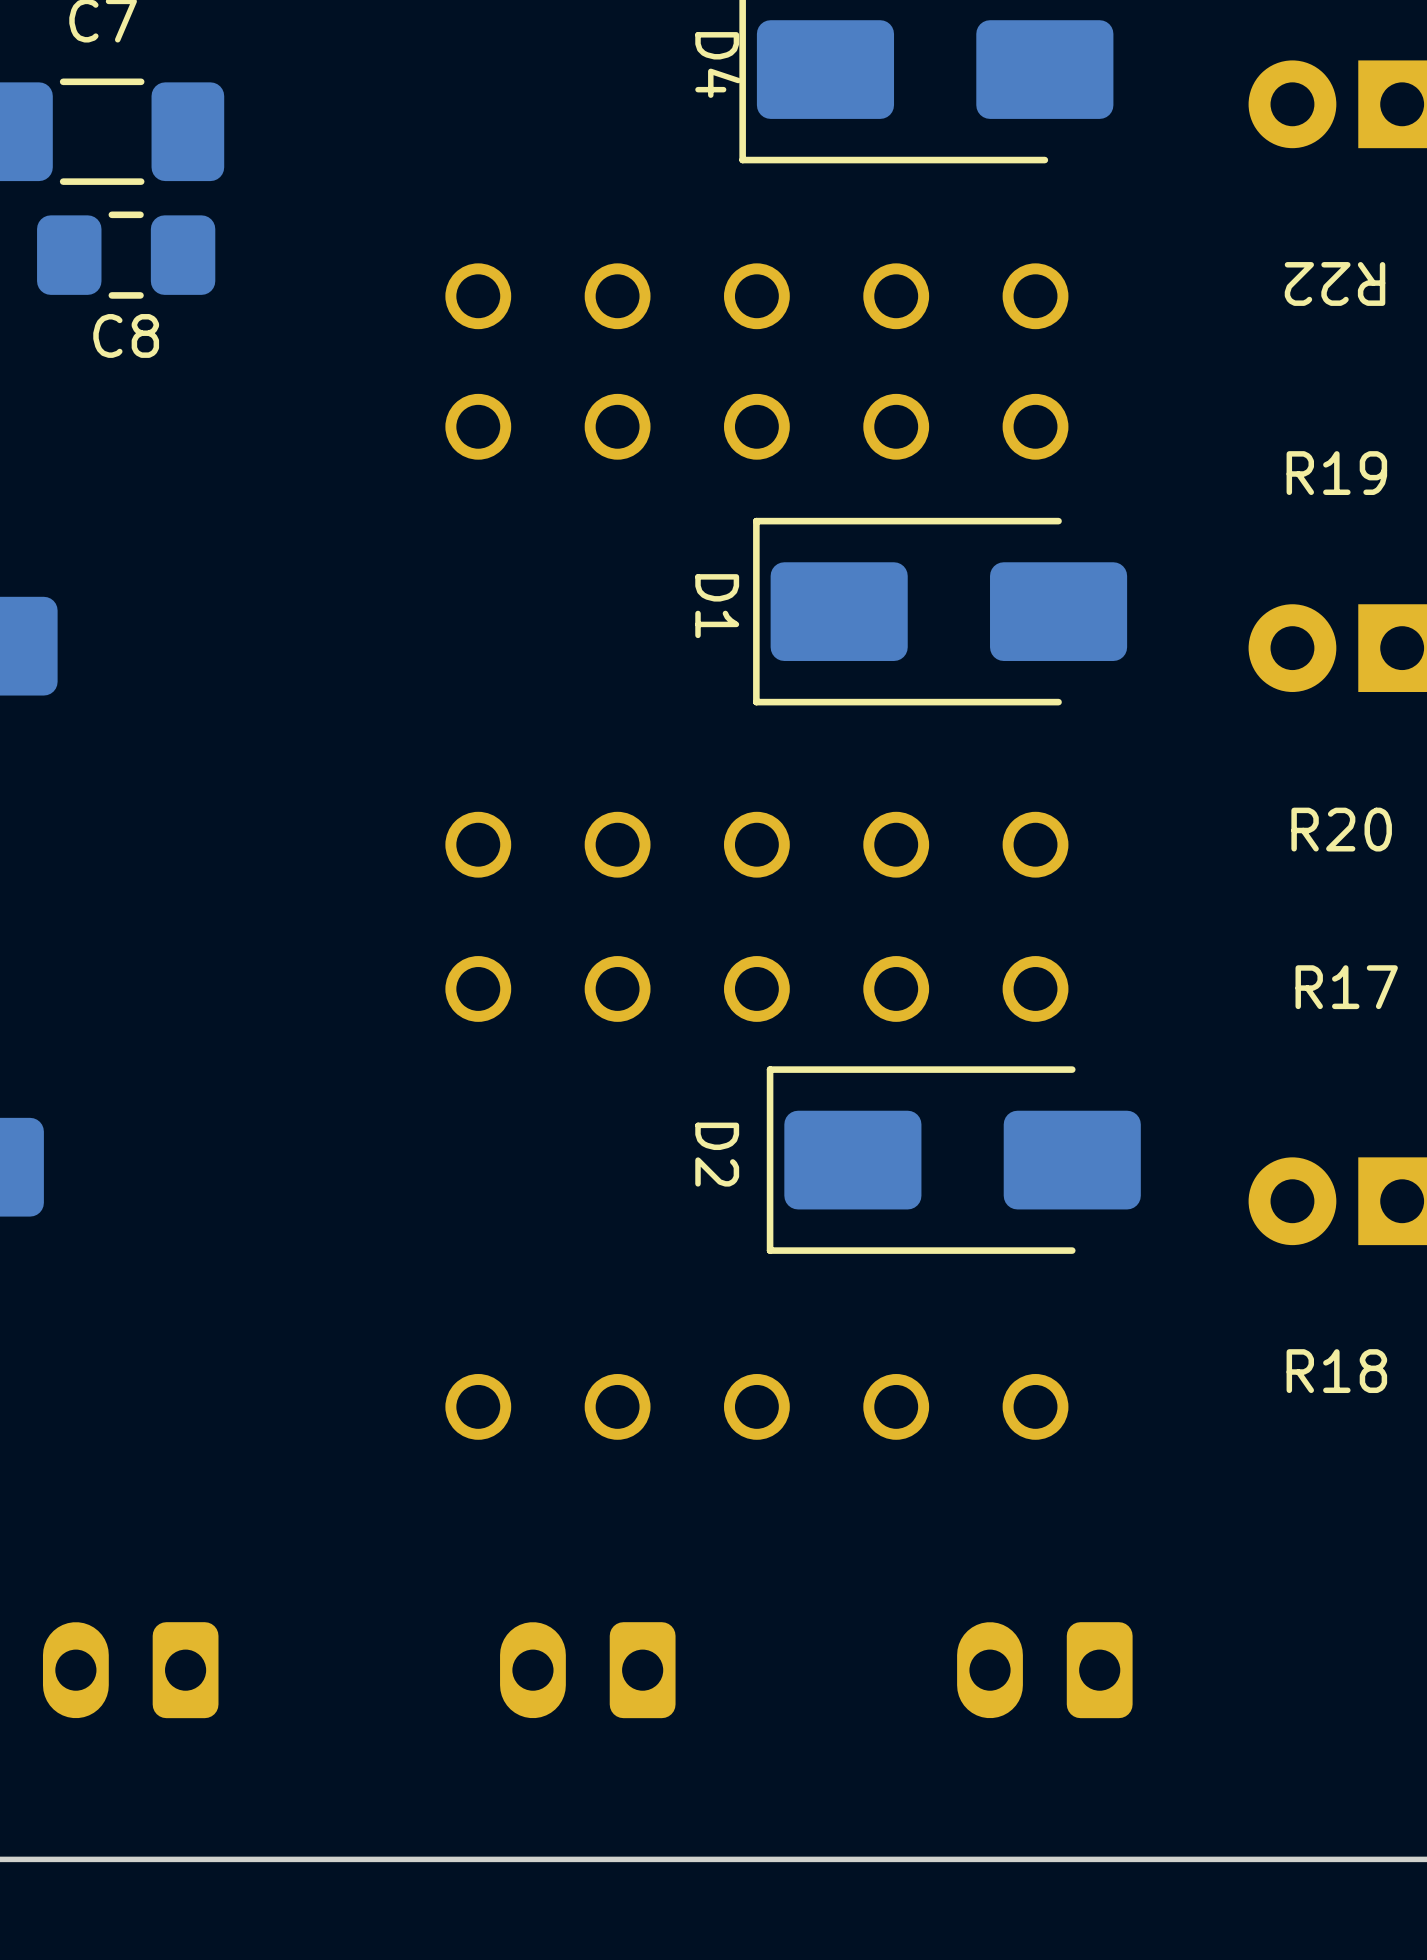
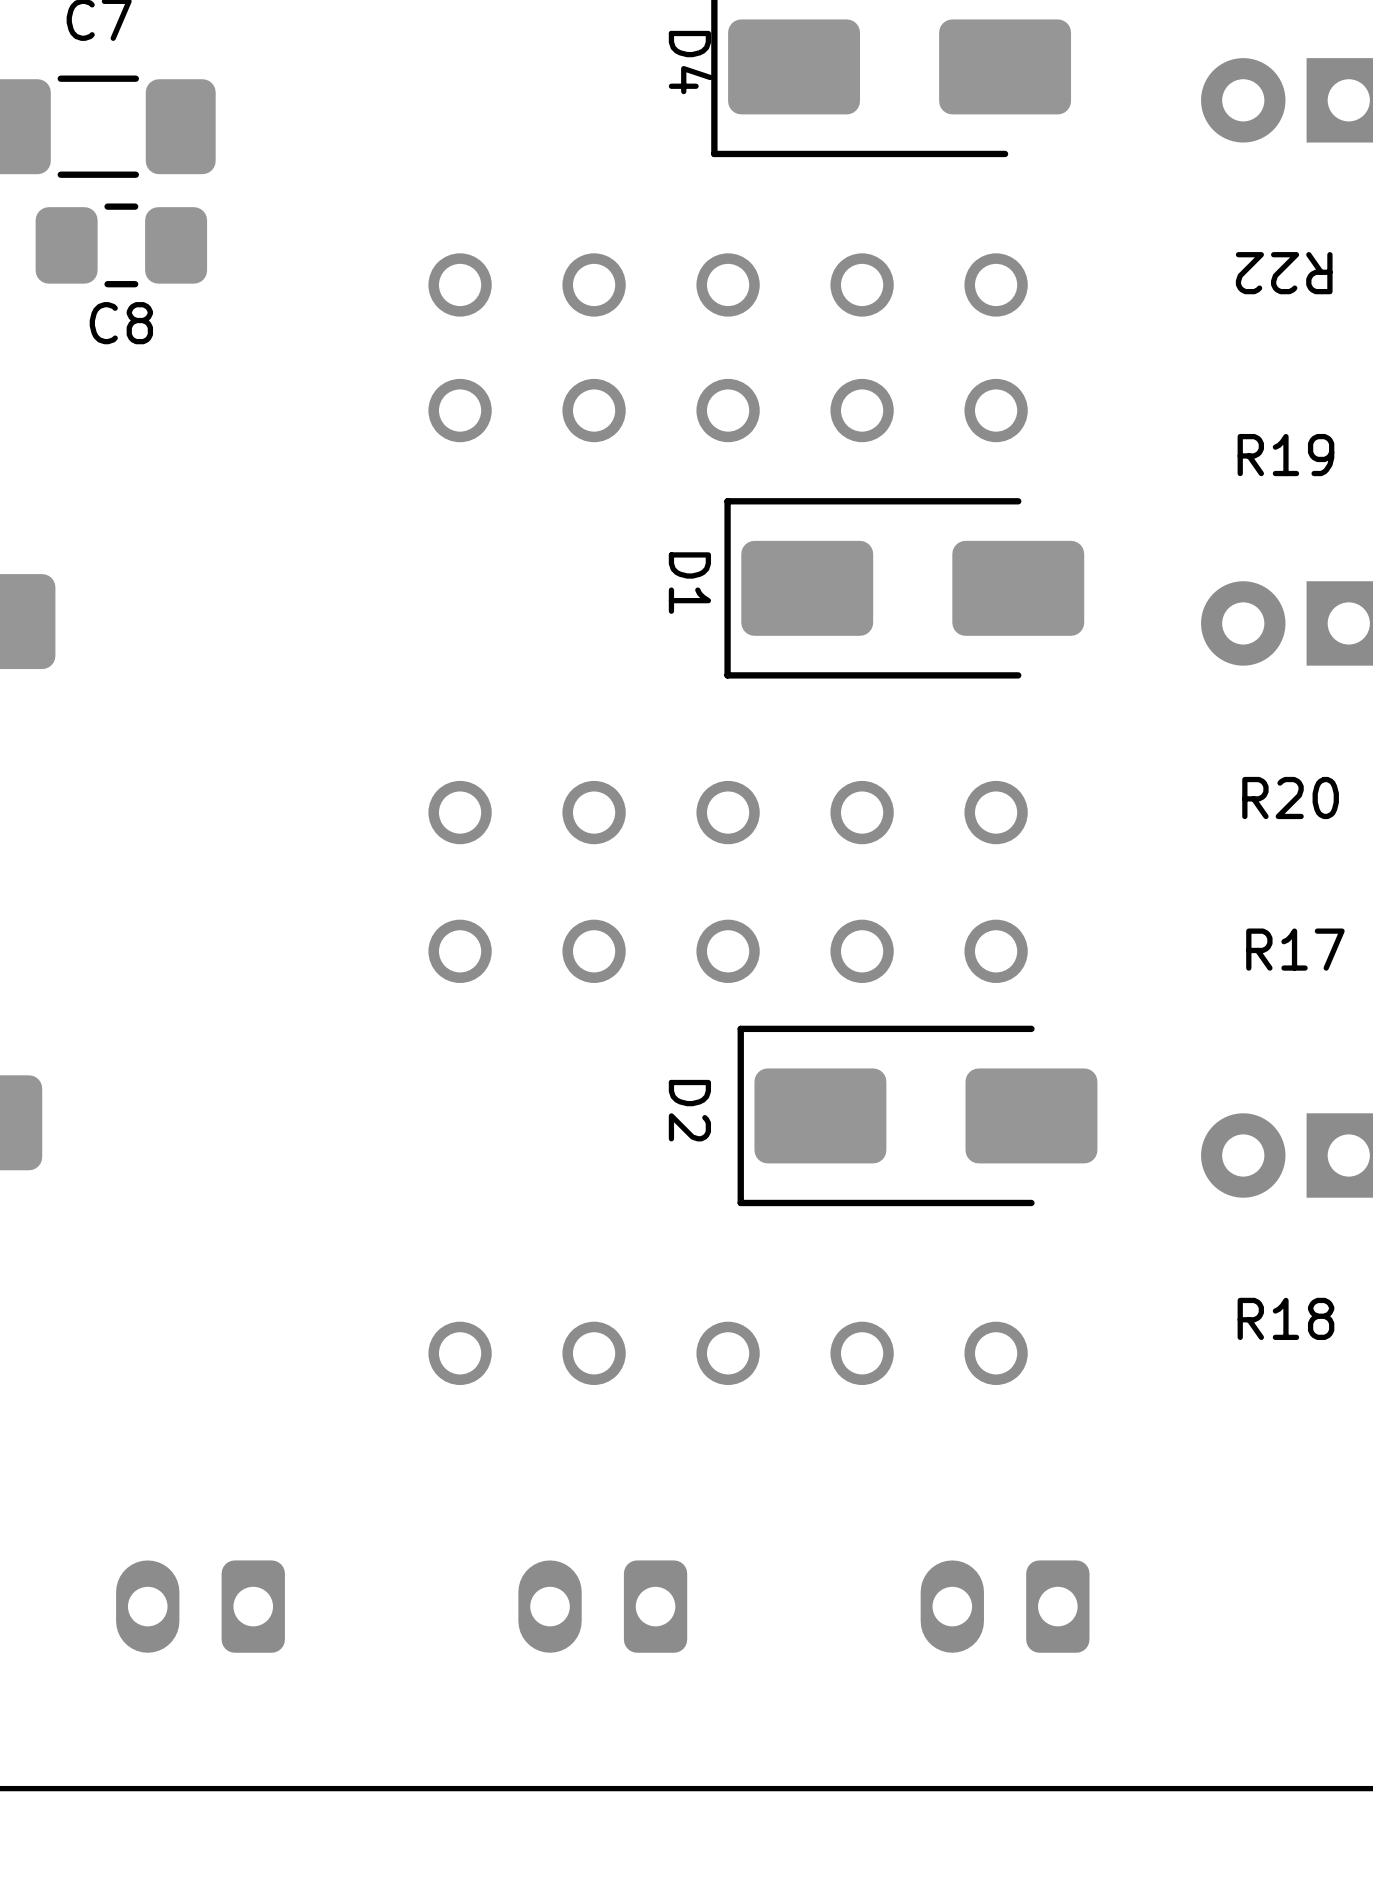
part position: (130, 1670) -> (200, 1606)
part position: (587, 1670) -> (602, 1606)

